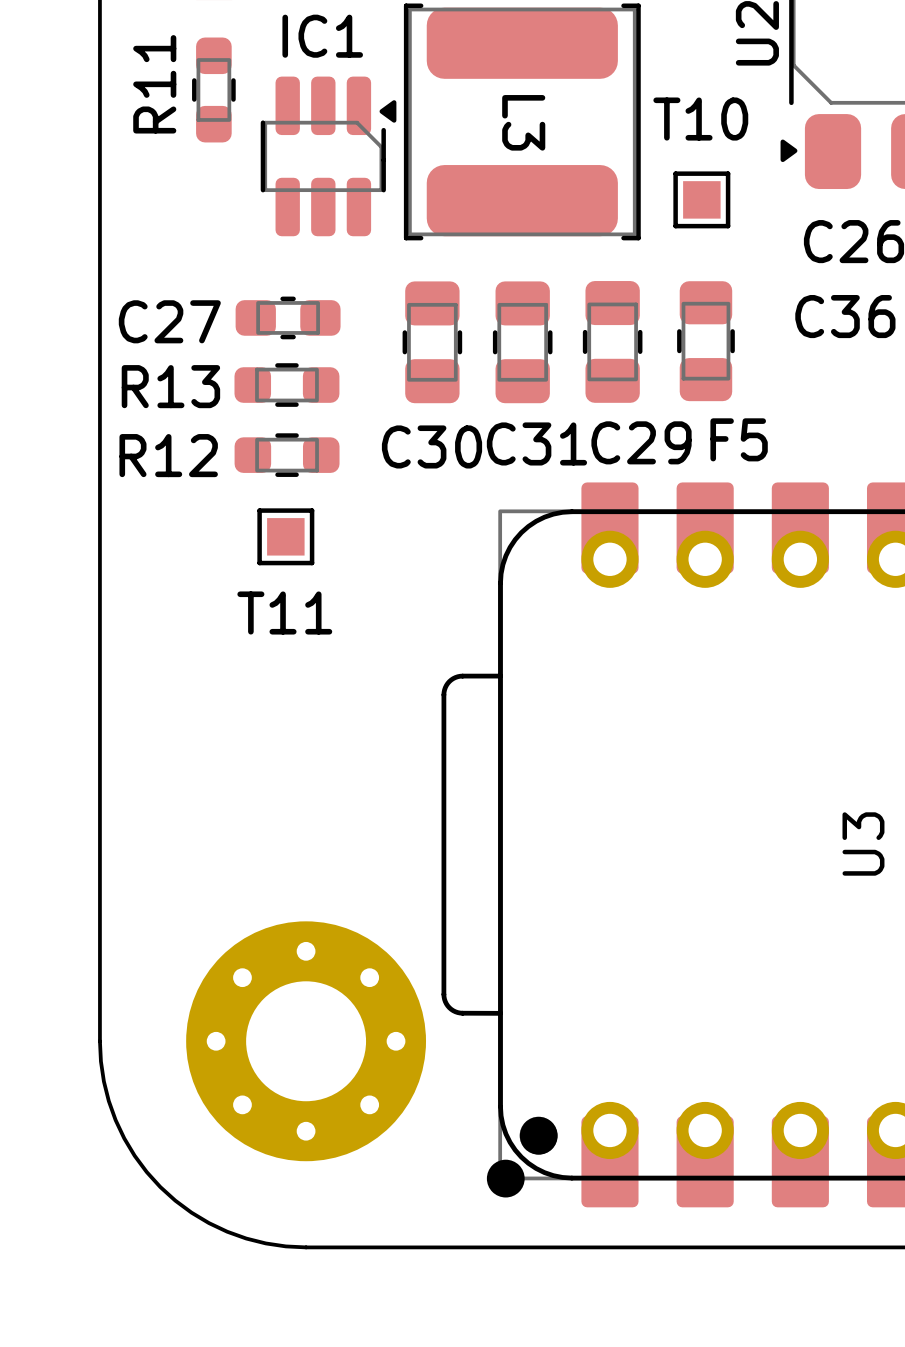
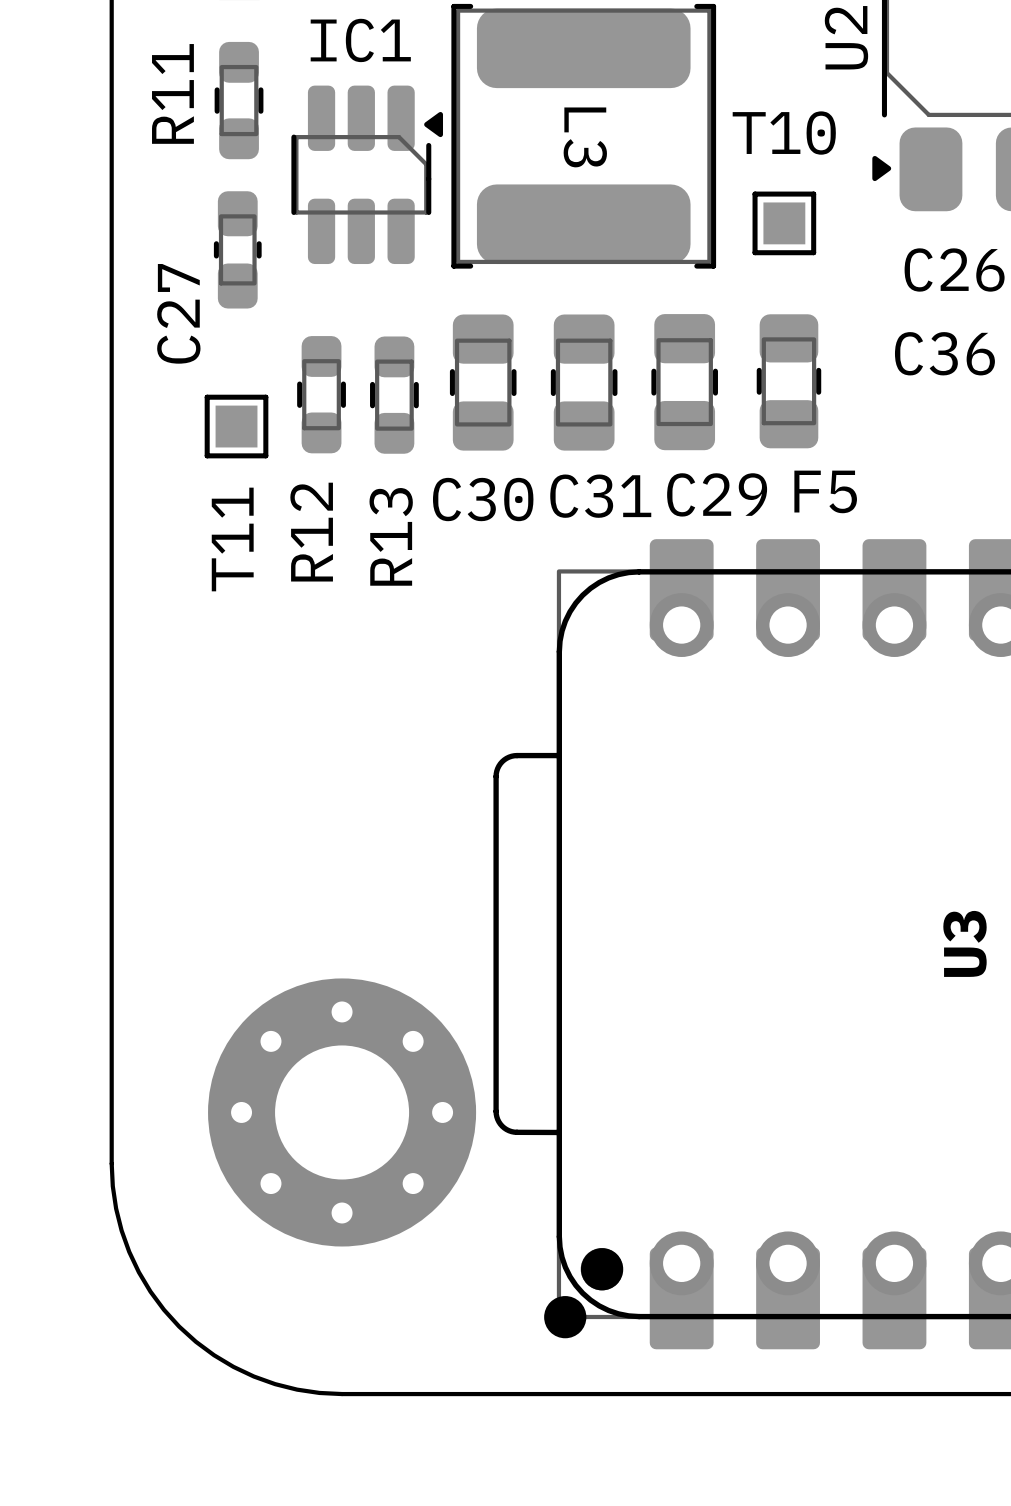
C27 rotation: 0° (288, 317) -> 90° clockwise (237, 249)
C27 position: (288, 317) -> (237, 249)
C27 name position: C27 (169, 321) -> C27 (178, 313)
R13 rotation: 0° (286, 385) -> 90° clockwise (394, 395)
R13 position: (286, 385) -> (394, 395)
R13 name position: R13 (170, 386) -> R13 (391, 536)
R12 name position: R12 (168, 455) -> R12 (311, 532)
R12 rotation: 0° (287, 455) -> 90° clockwise (321, 394)
R12 position: (287, 455) -> (321, 394)
T11 position: (285, 536) -> (236, 426)
T11 name rotation: 0° (284, 612) -> 90° counterclockwise (232, 539)
part position: (306, 1041) -> (342, 1112)

